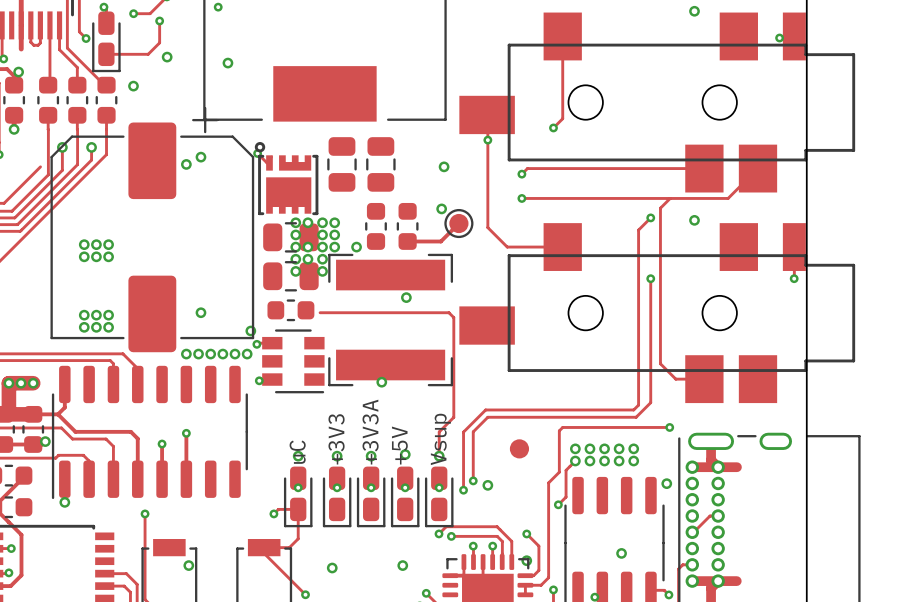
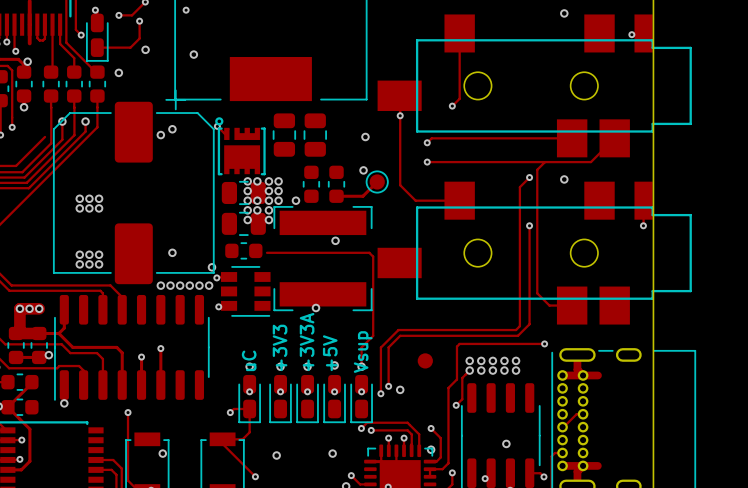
via: (666, 483) -> none

